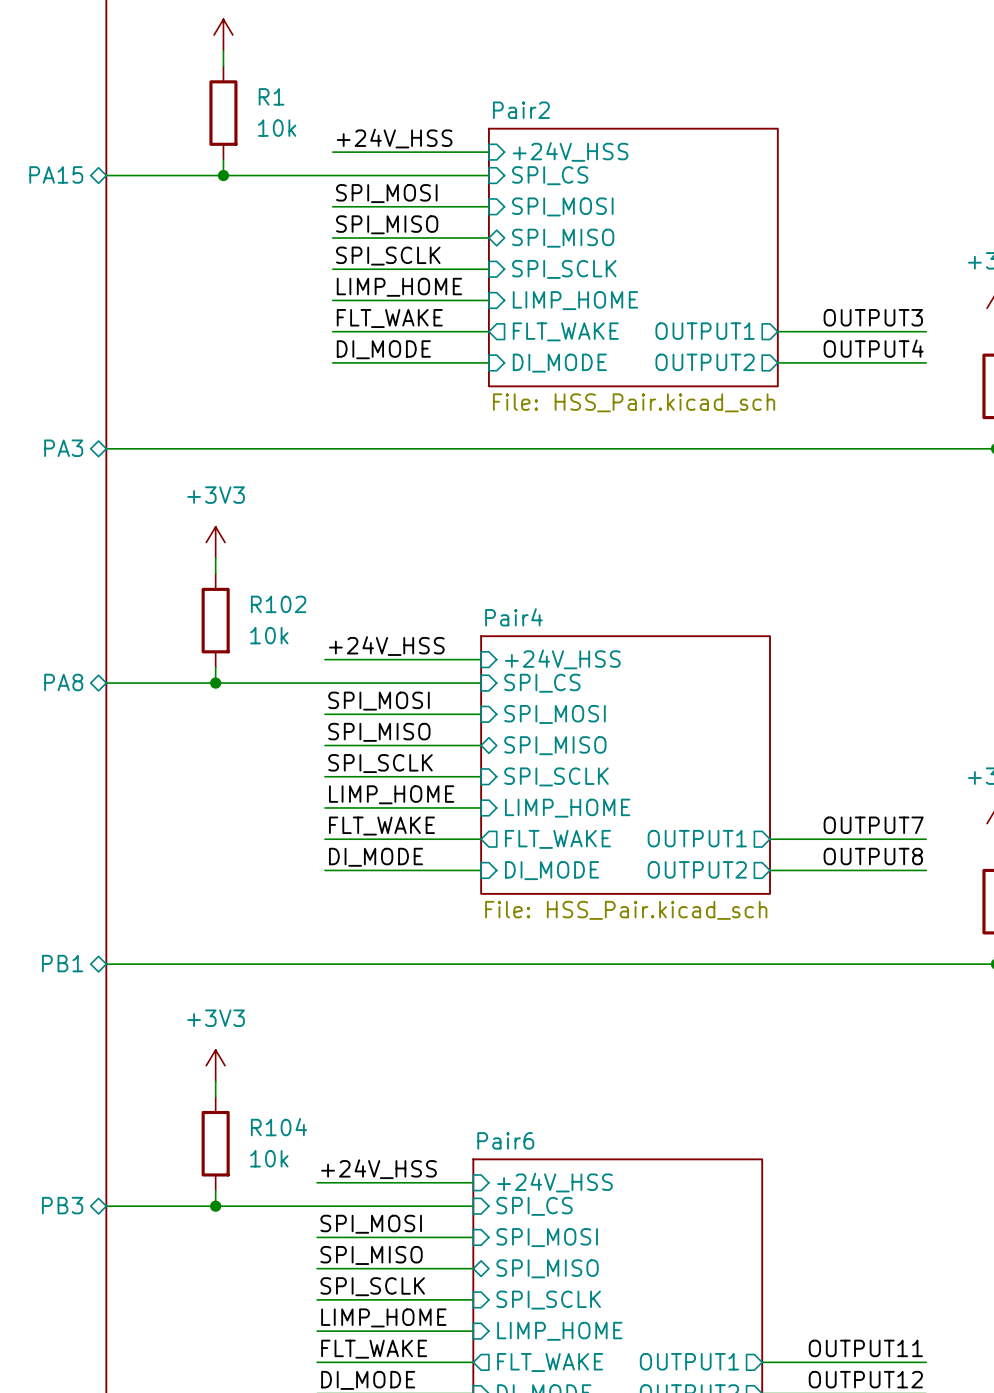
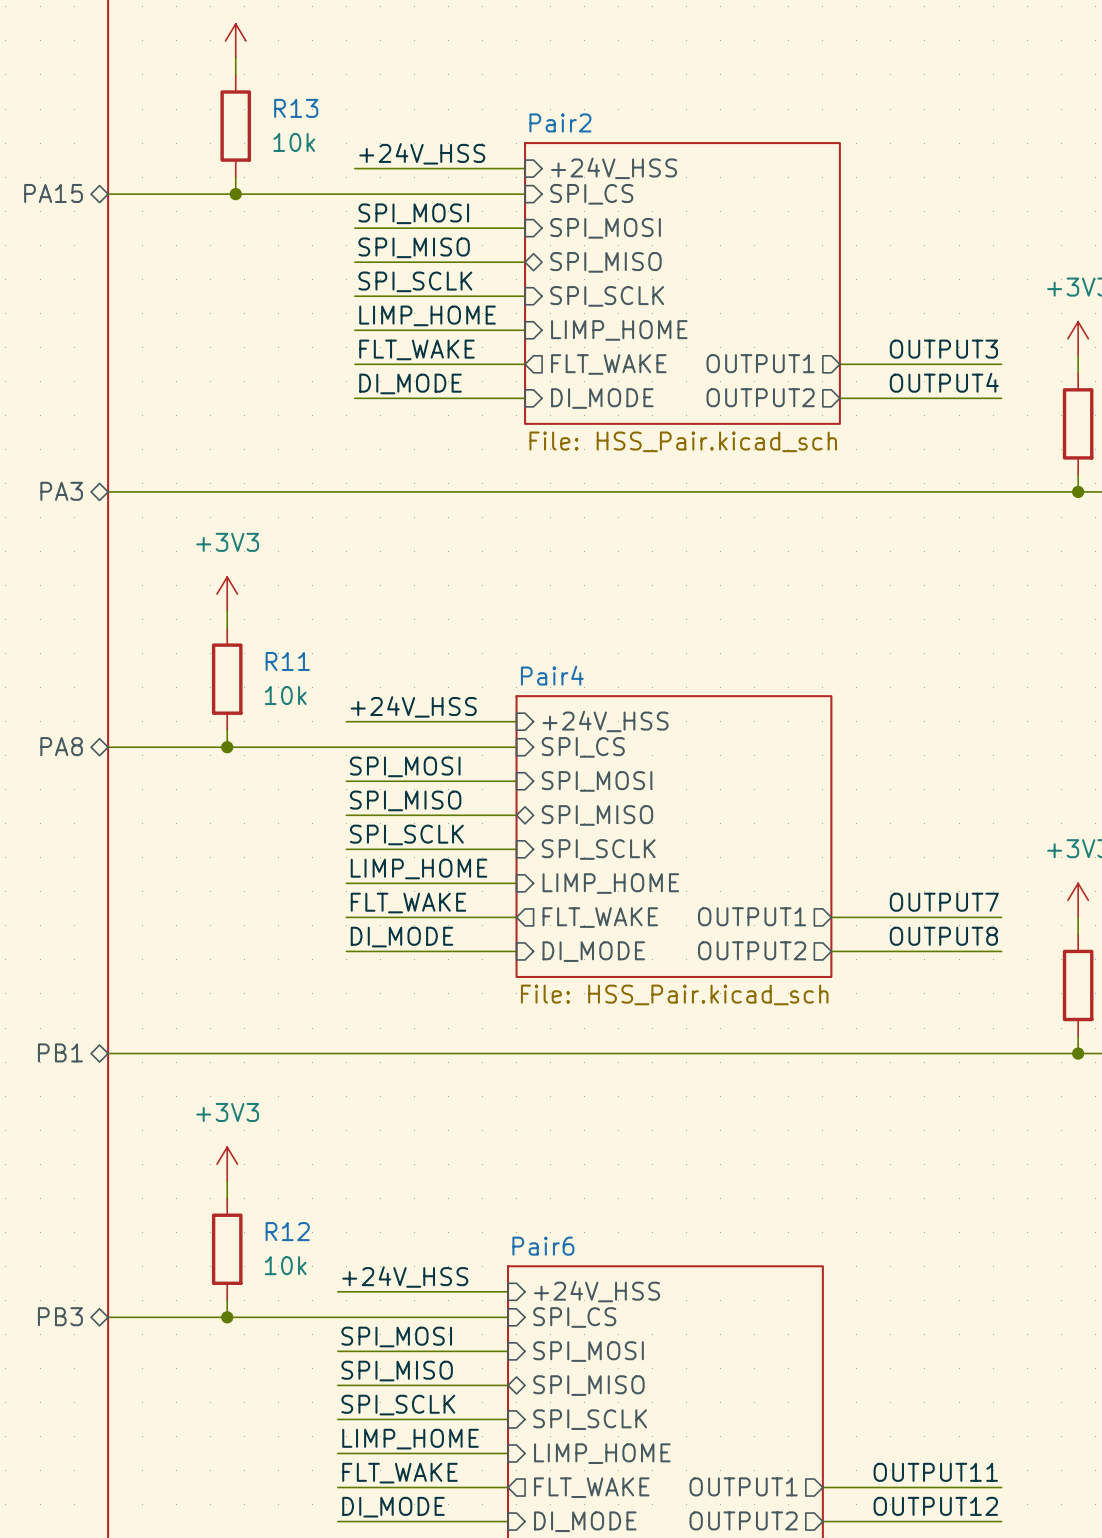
R1 name: R1 (271, 96) -> R13 (296, 108)
R102 name: R102 (278, 604) -> R11 (287, 661)
R104 name: R104 (278, 1127) -> R12 (287, 1231)

